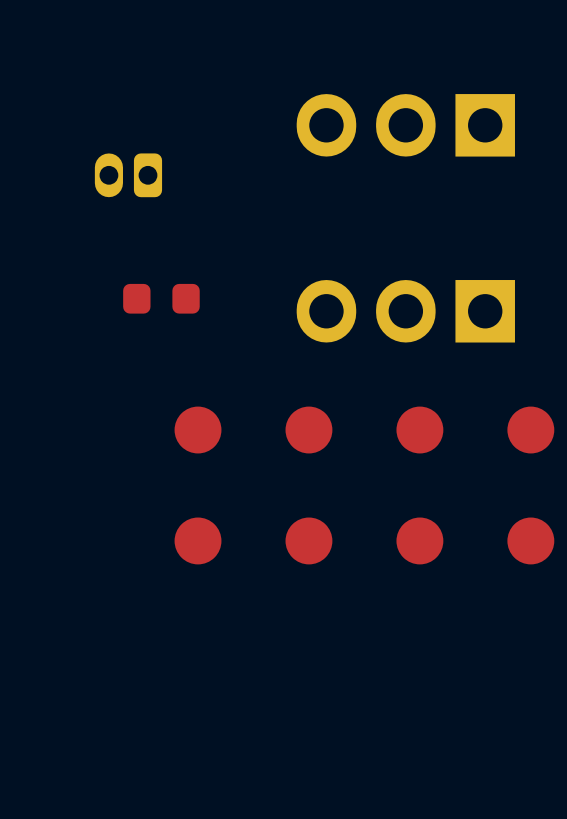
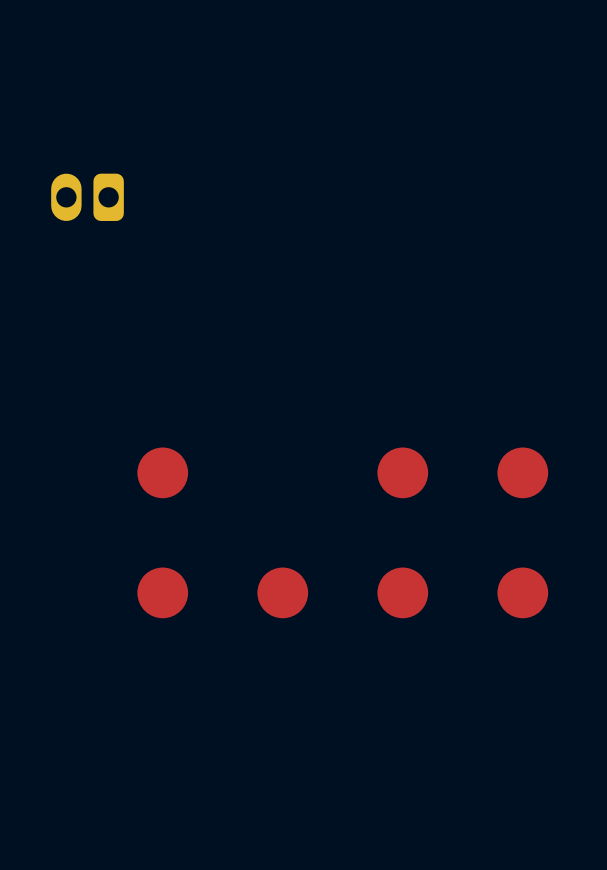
part: (405, 125) -> none
part: (161, 298) -> none
part: (405, 311) -> none
part: (308, 430) -> none

